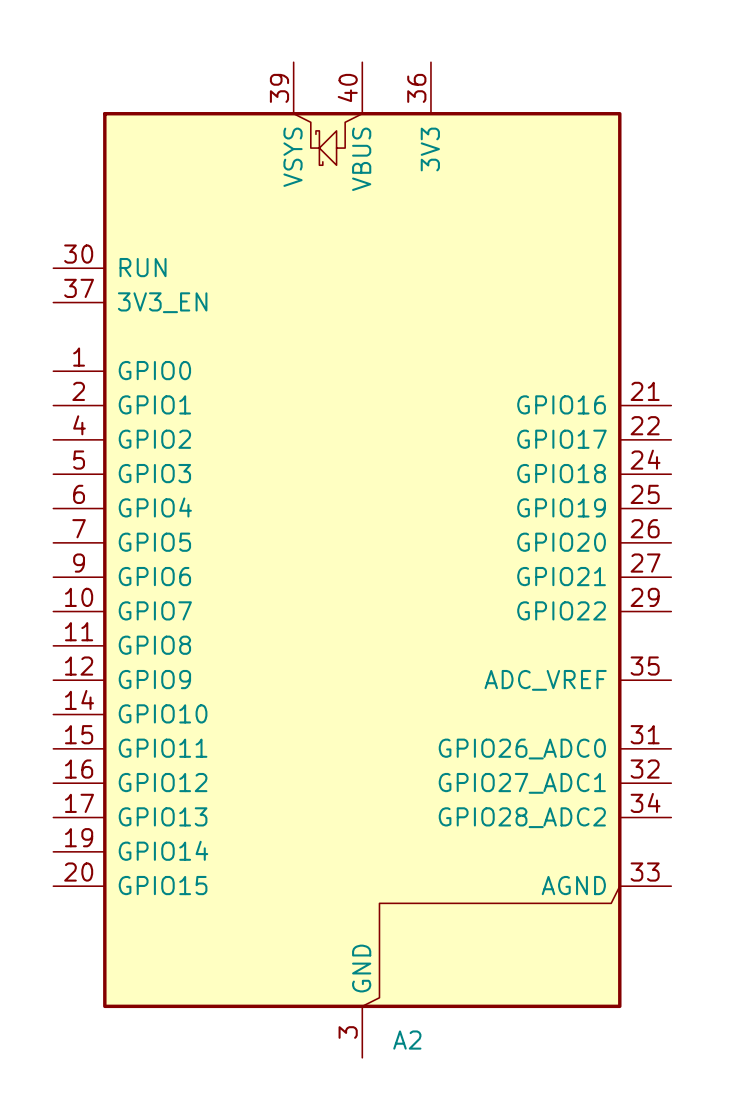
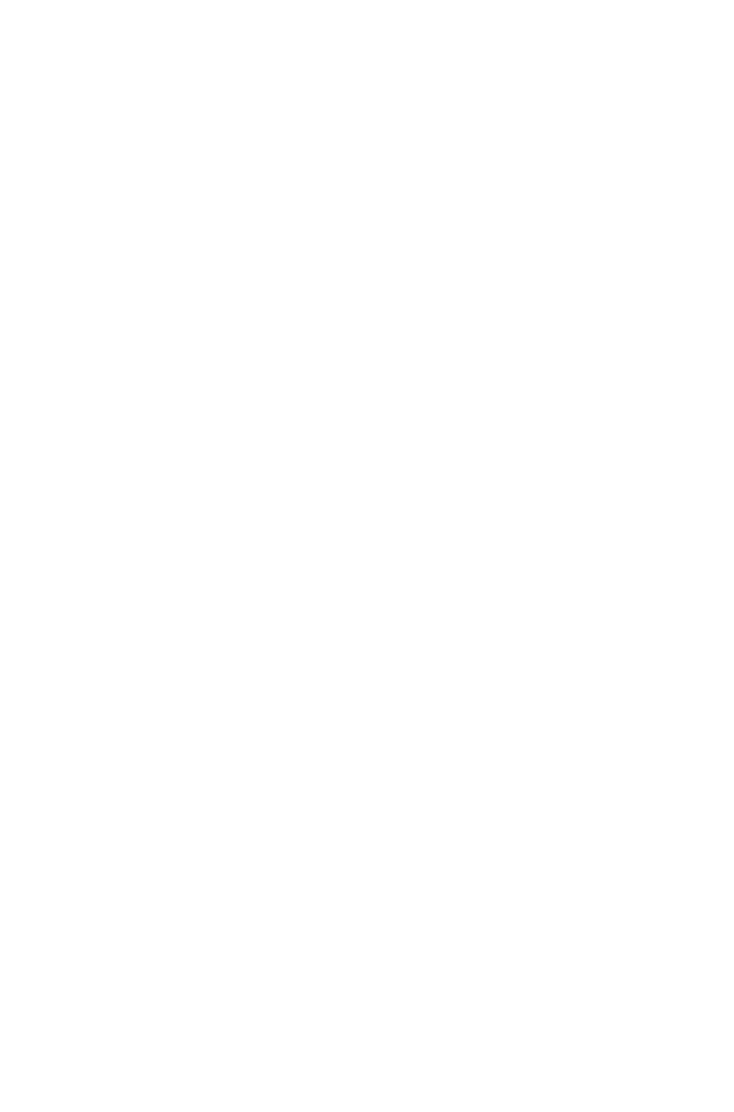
A2: (362, 560) -> none

